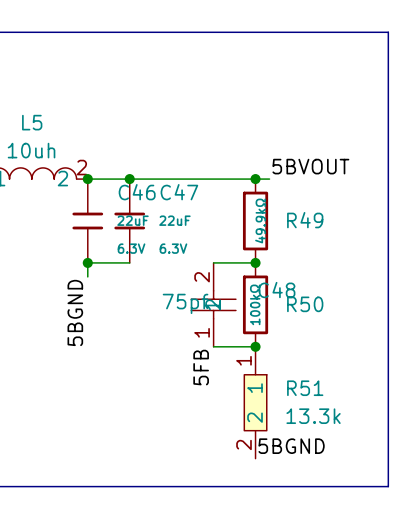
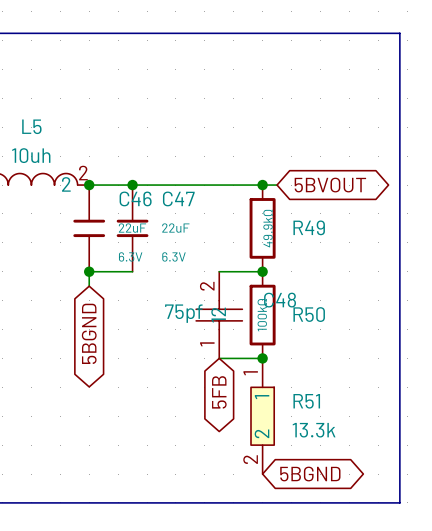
label: 5BVOUT (310, 166) -> none
global label: none -> 5BVOUT (330, 185)
label: 5BGND (75, 312) -> none
global label: none -> 5BGND (89, 333)
label: 5FB (201, 367) -> none
global label: none -> 5FB (219, 392)
label: 5BGND (291, 446) -> none
global label: none -> 5BGND (310, 474)

